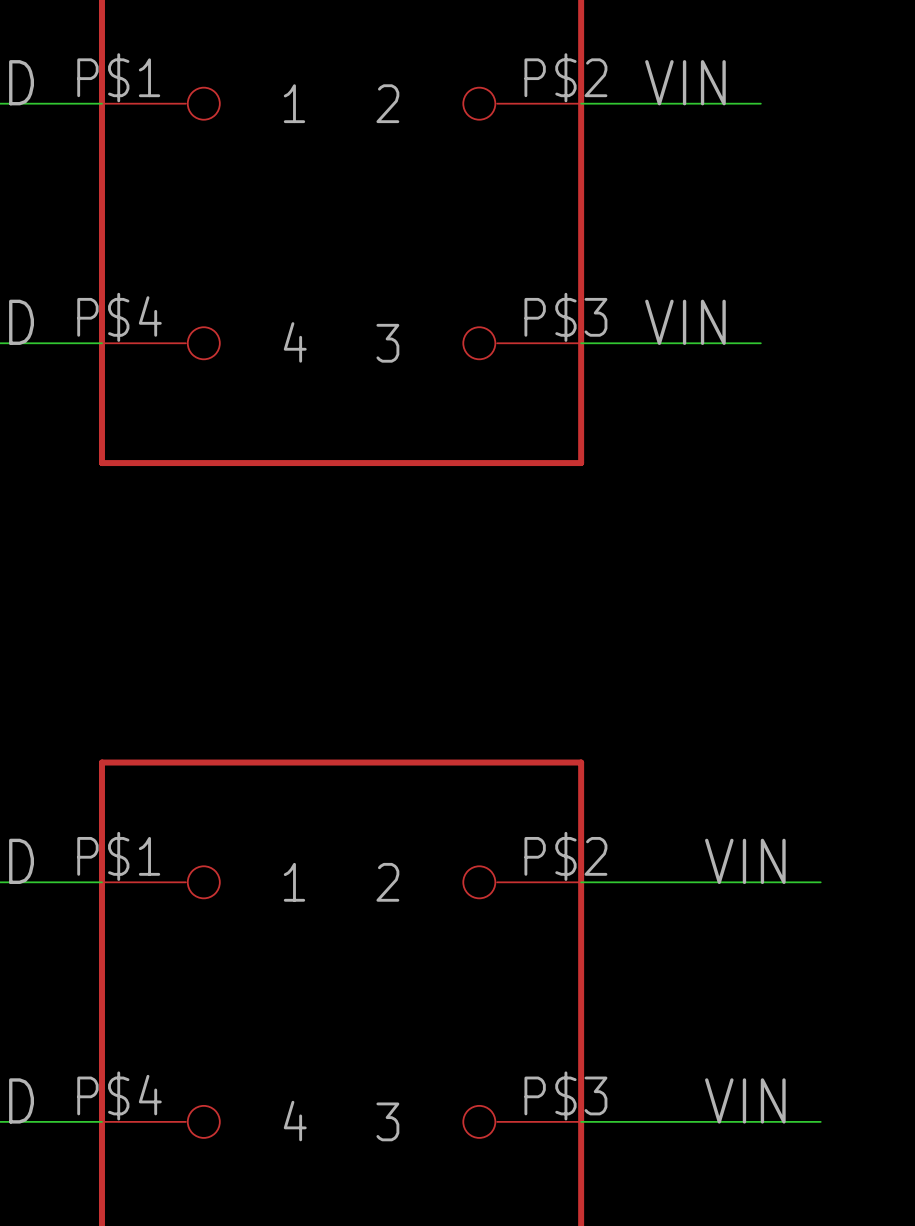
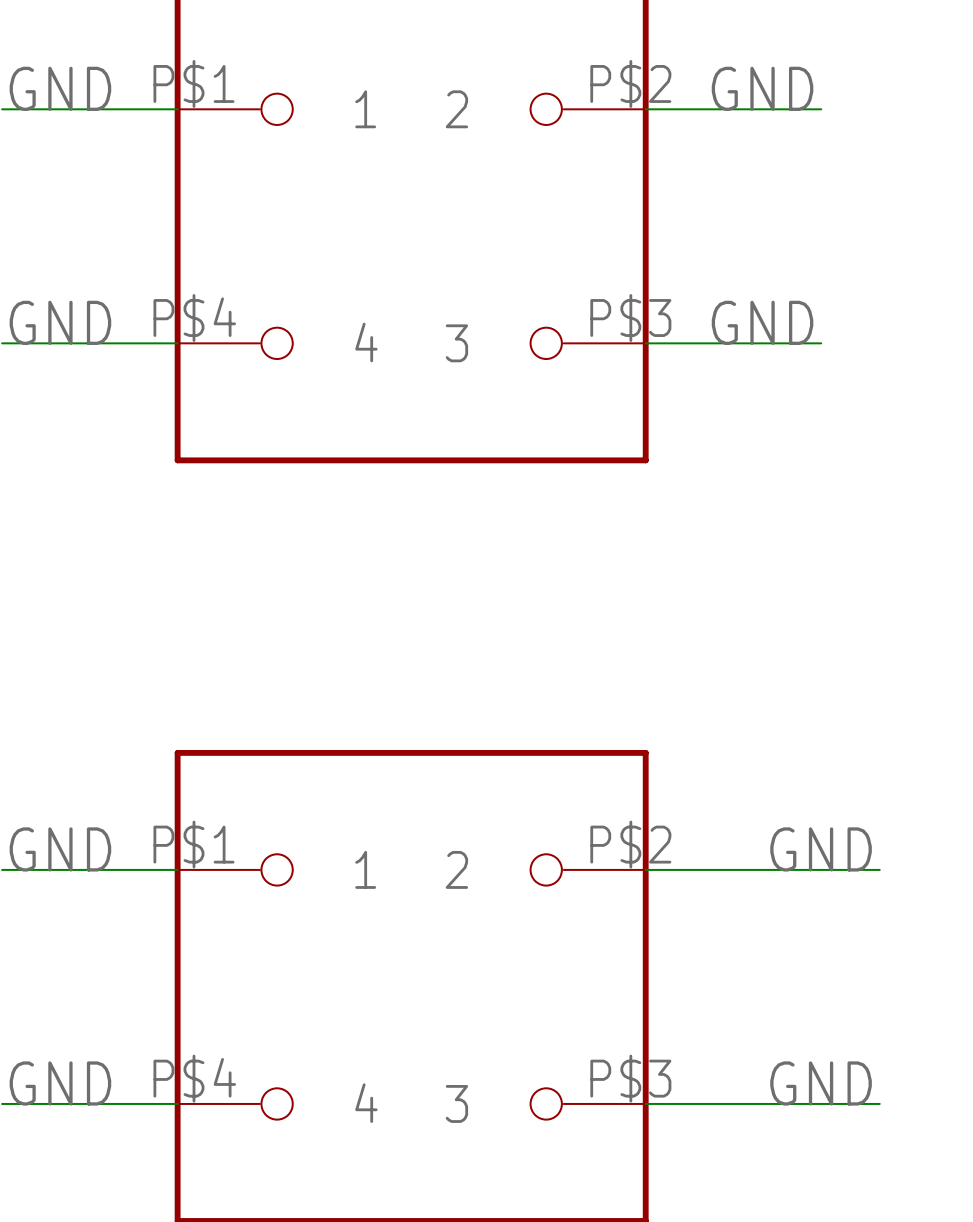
label: VIN (685, 82) -> GND (762, 88)
label: VIN (685, 322) -> GND (762, 322)
label: VIN (745, 861) -> GND (821, 849)
label: VIN (745, 1100) -> GND (821, 1083)

